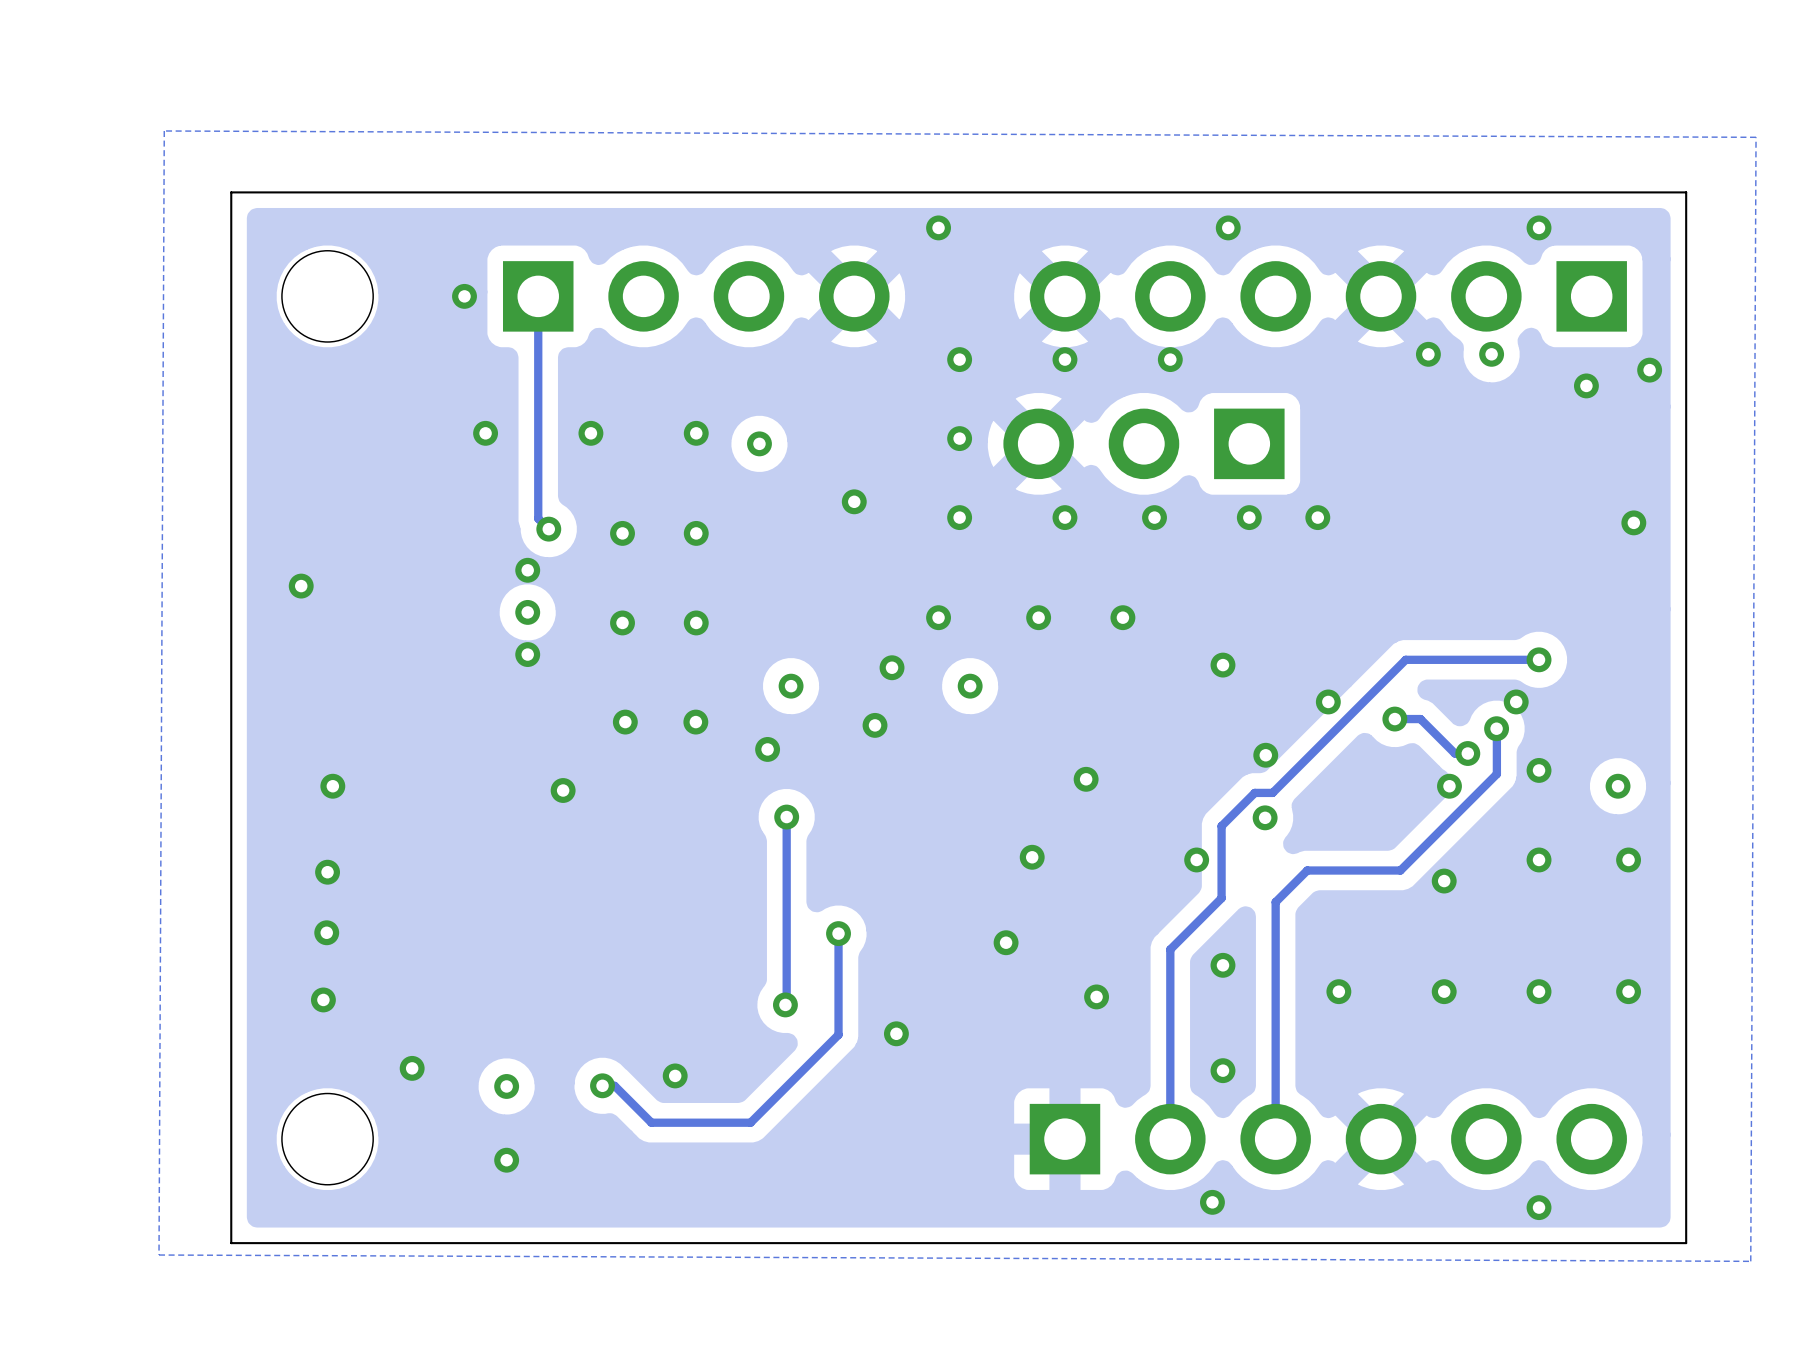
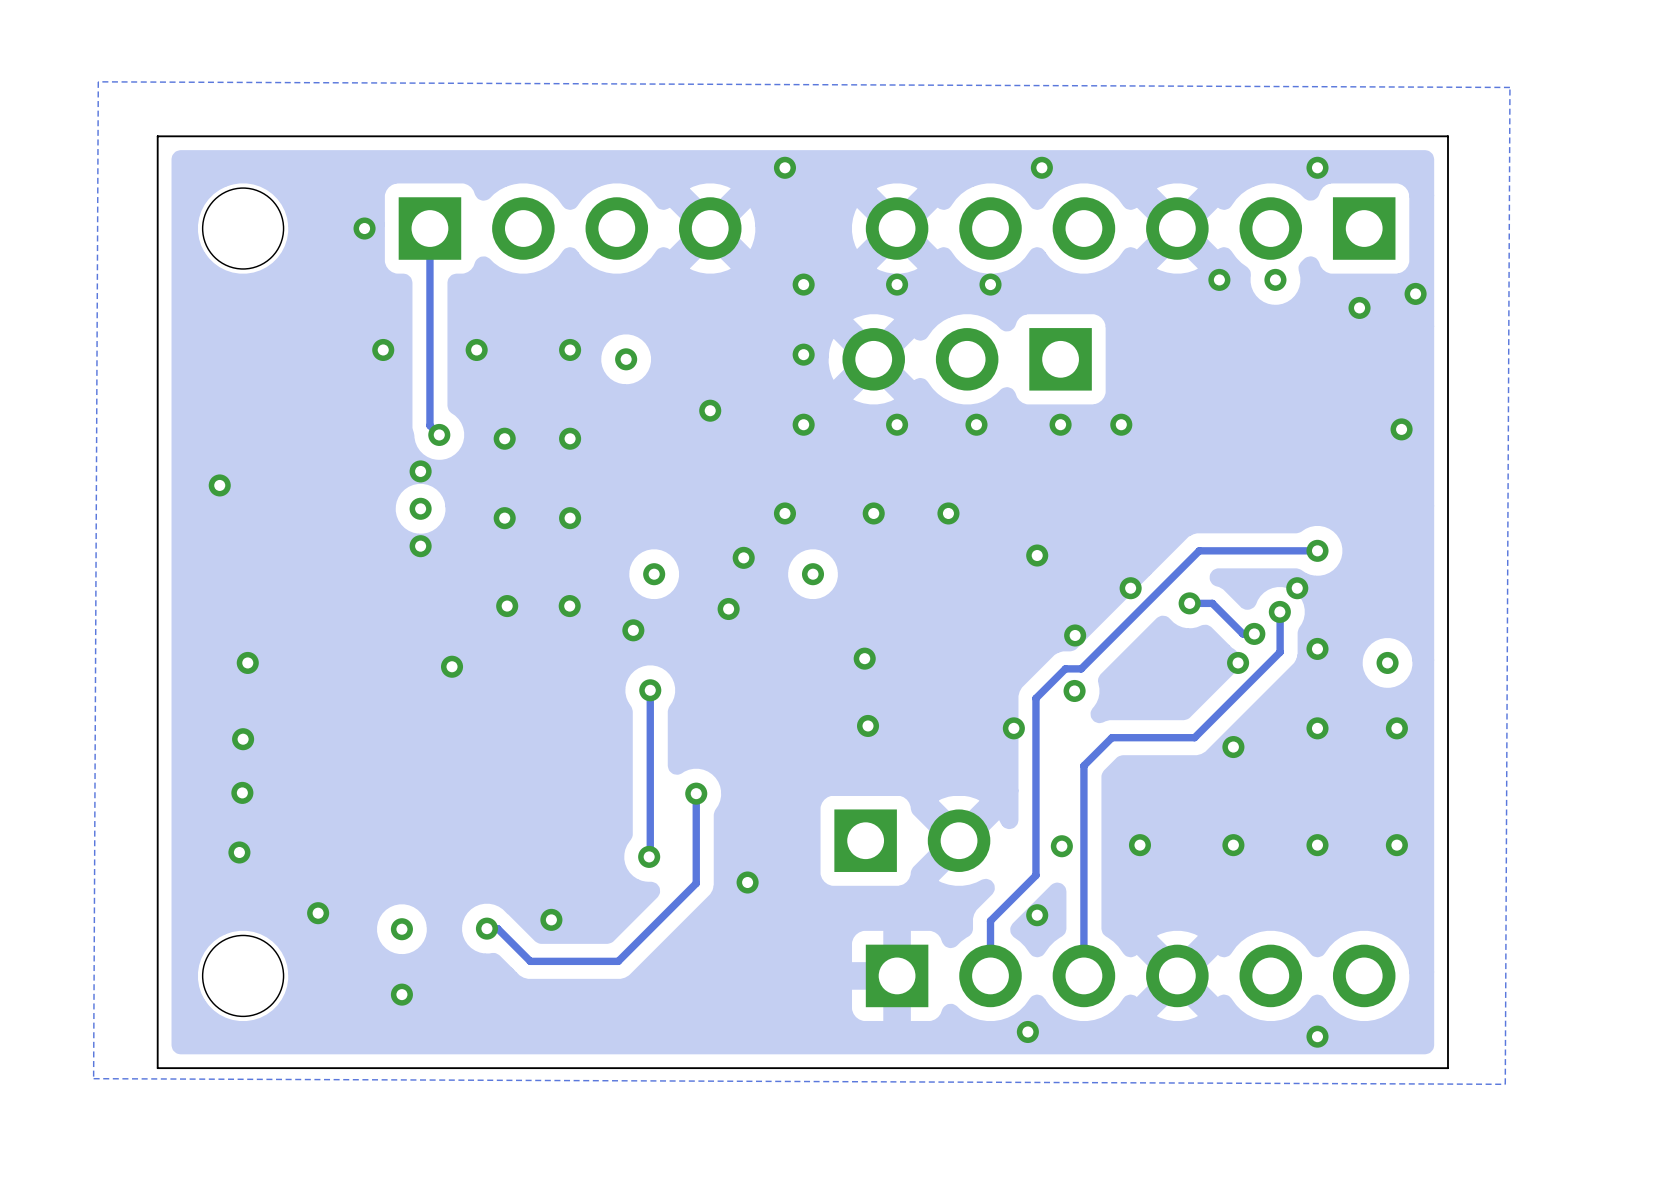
via position: (1086, 779) -> (864, 658)
track: (1221, 898) (1170, 949) (1170, 1077) -> (1035, 762) (1035, 875) (990, 920)
via: (1006, 942) -> none
via position: (1222, 965) -> (1061, 846)
part: none -> (912, 840)
via: (1096, 996) -> none

